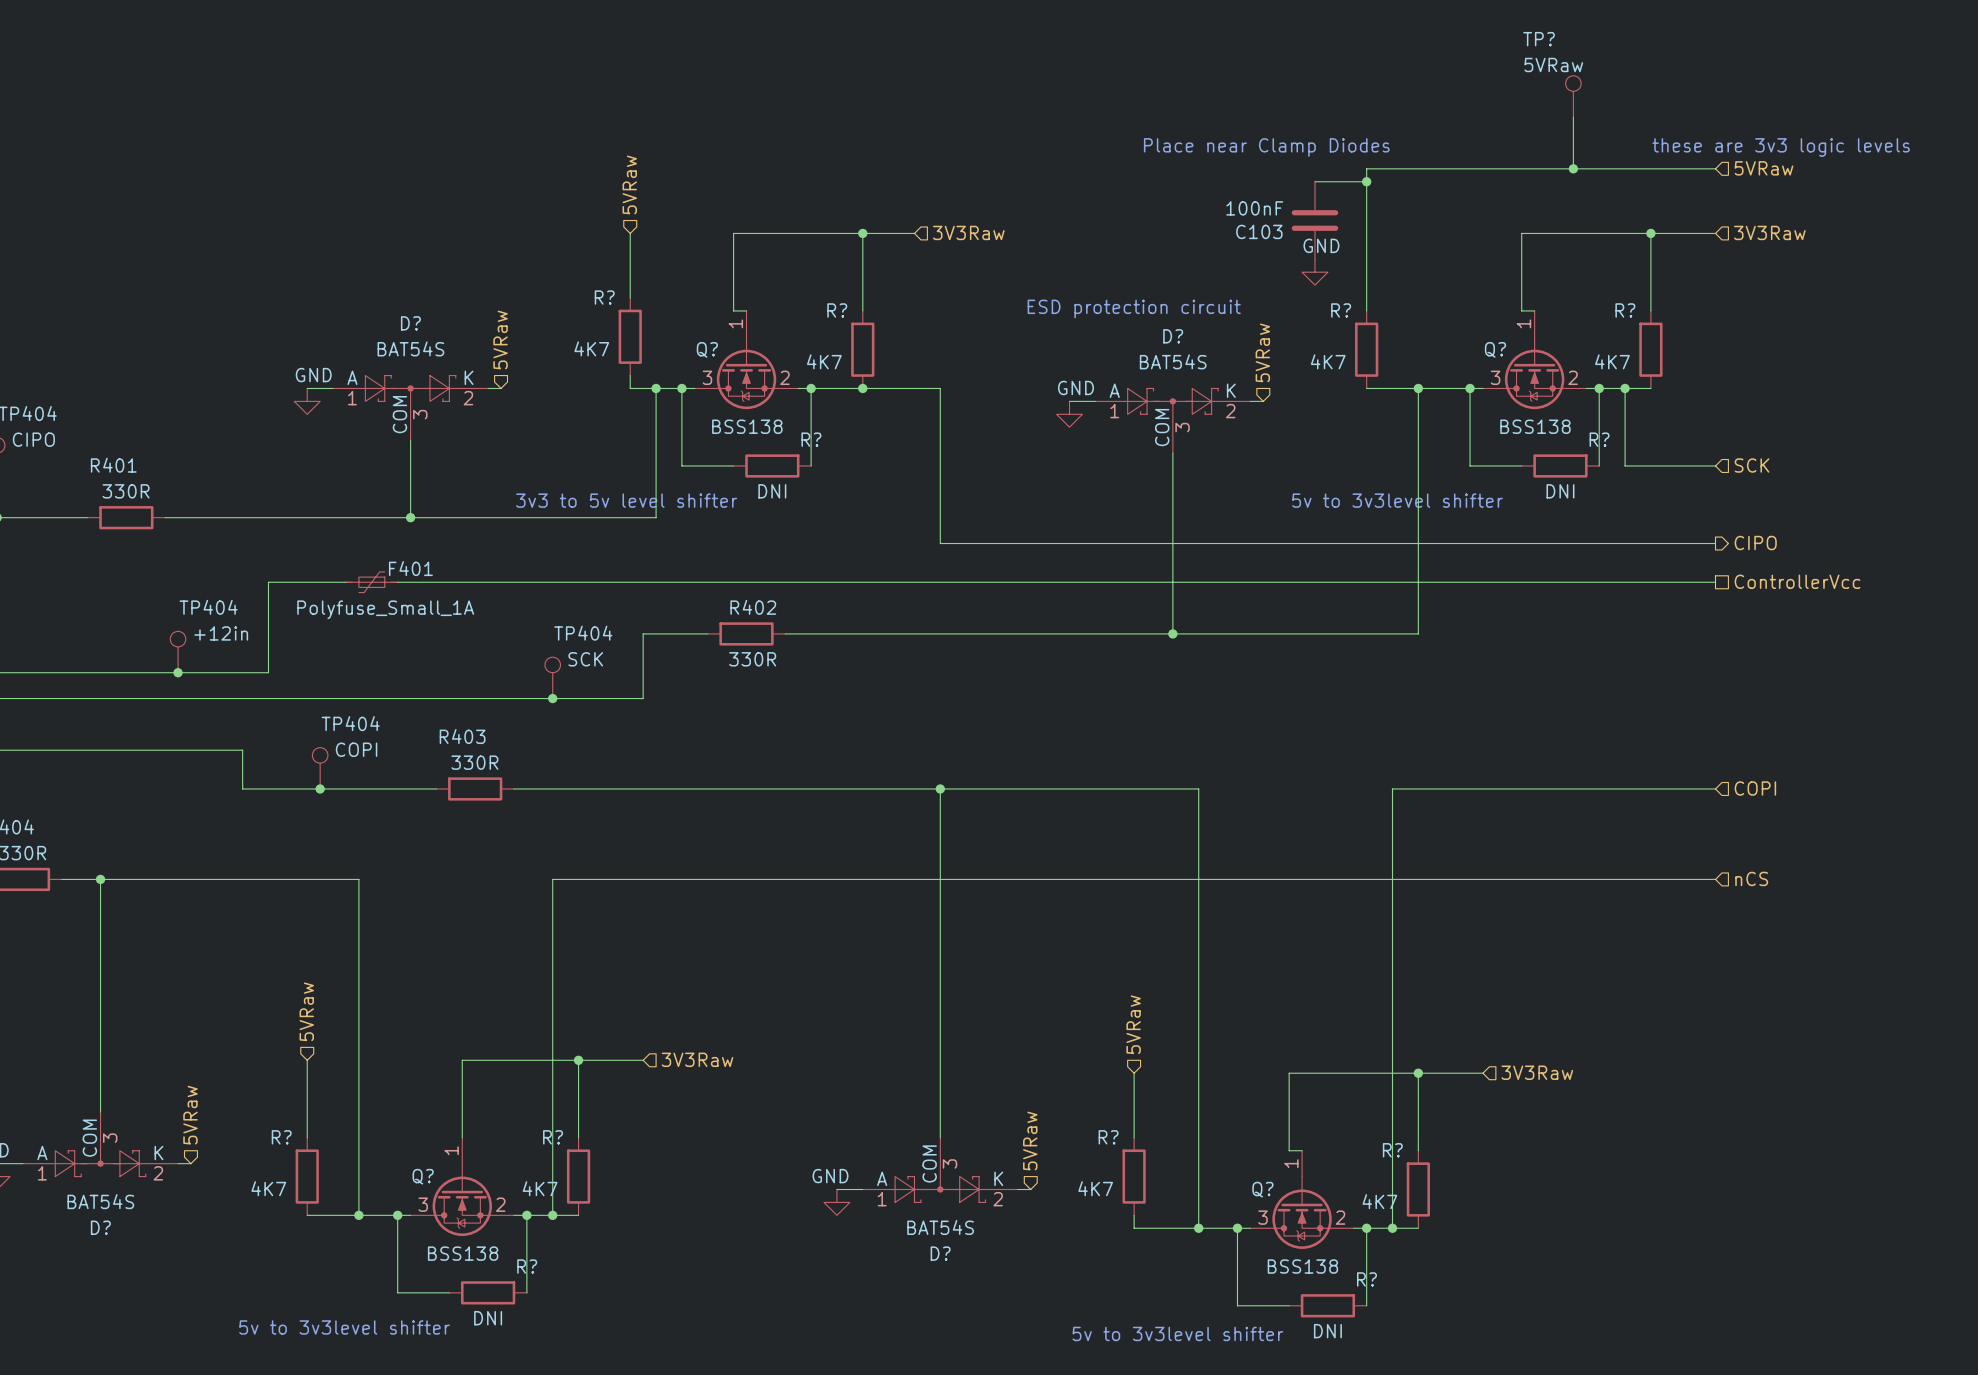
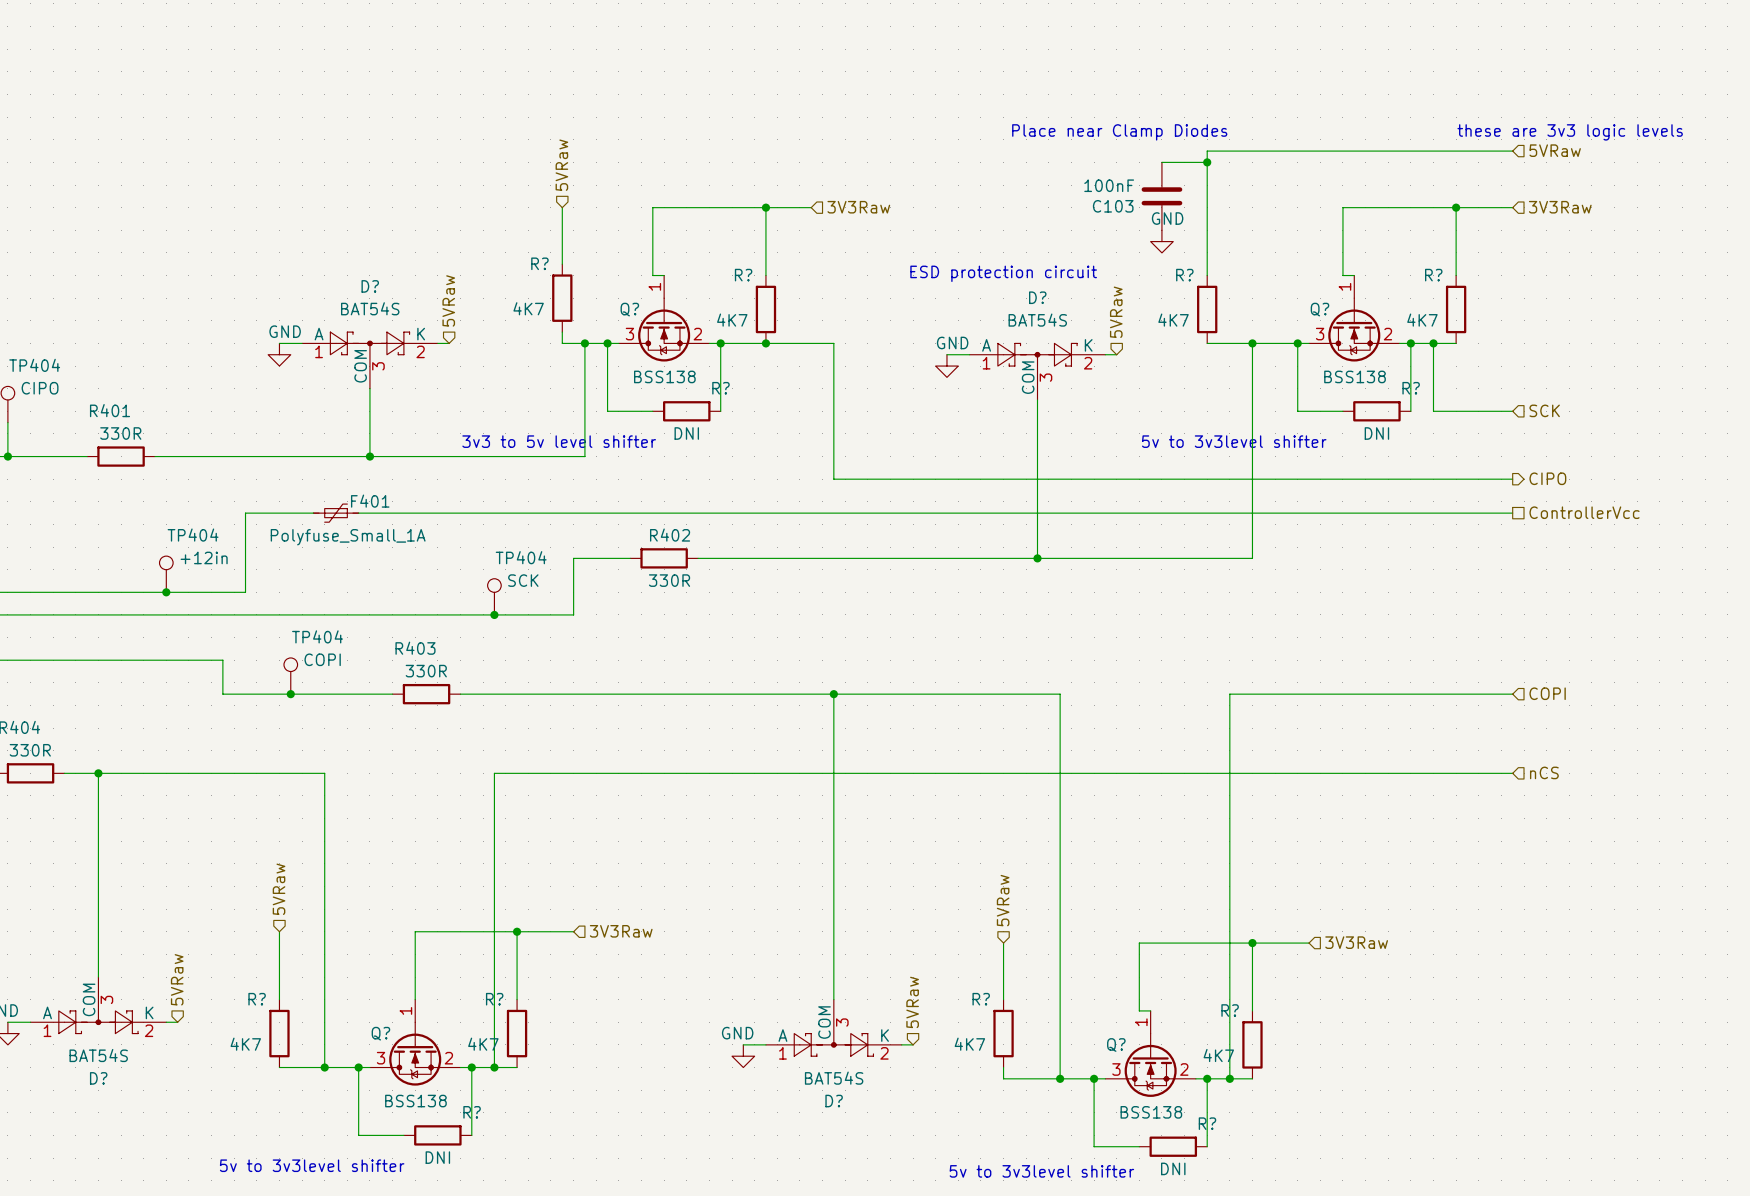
TP?: 5VRaw (1573, 96) -> none
wire: (1573, 117) (1573, 168) -> none
junction: (1573, 168) -> none

